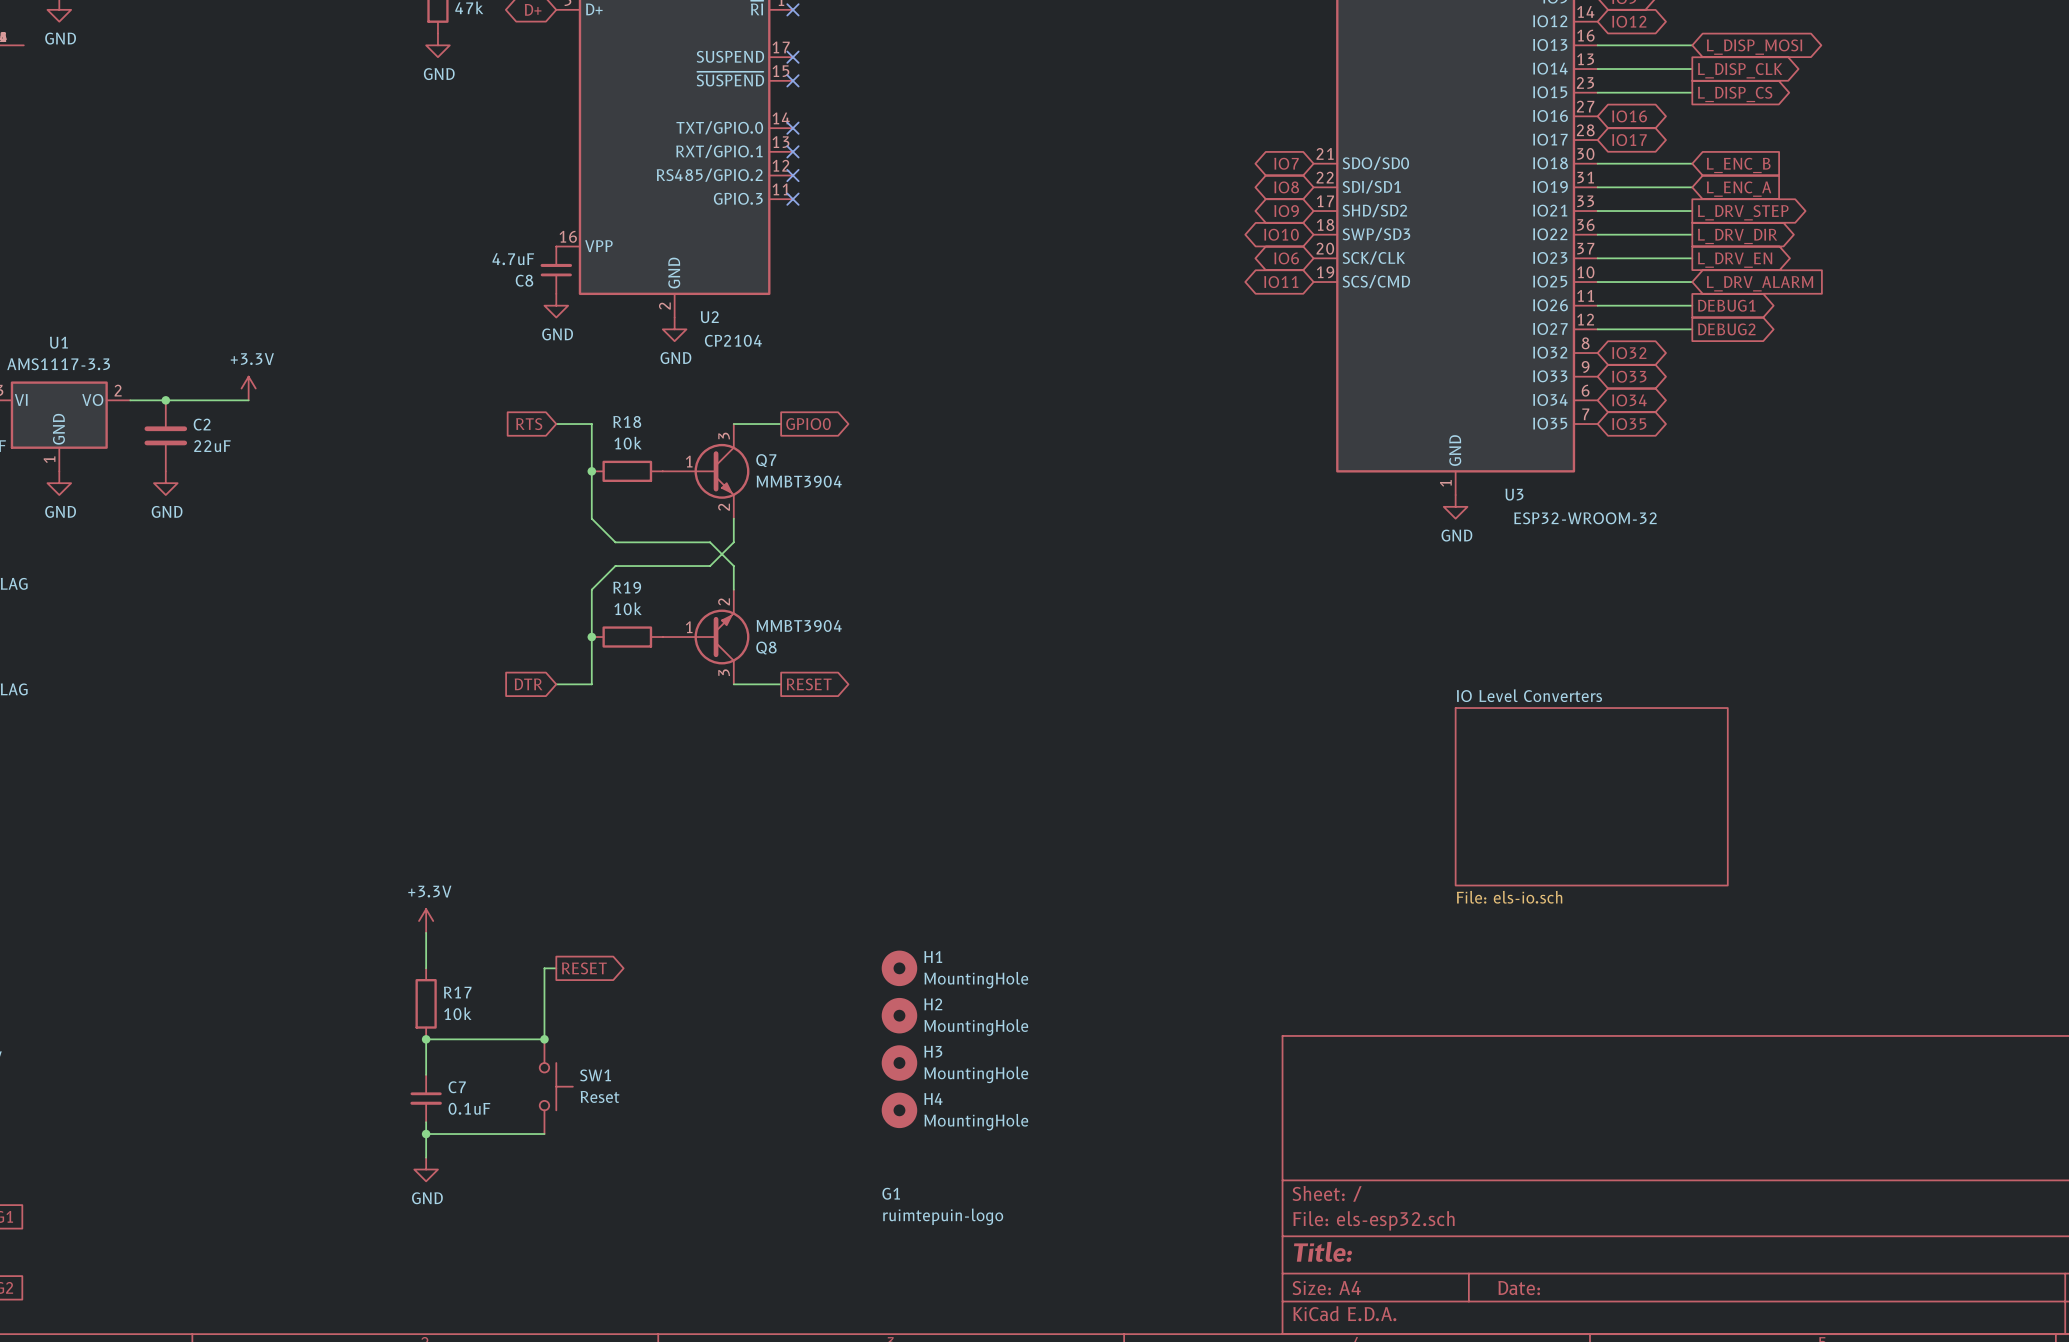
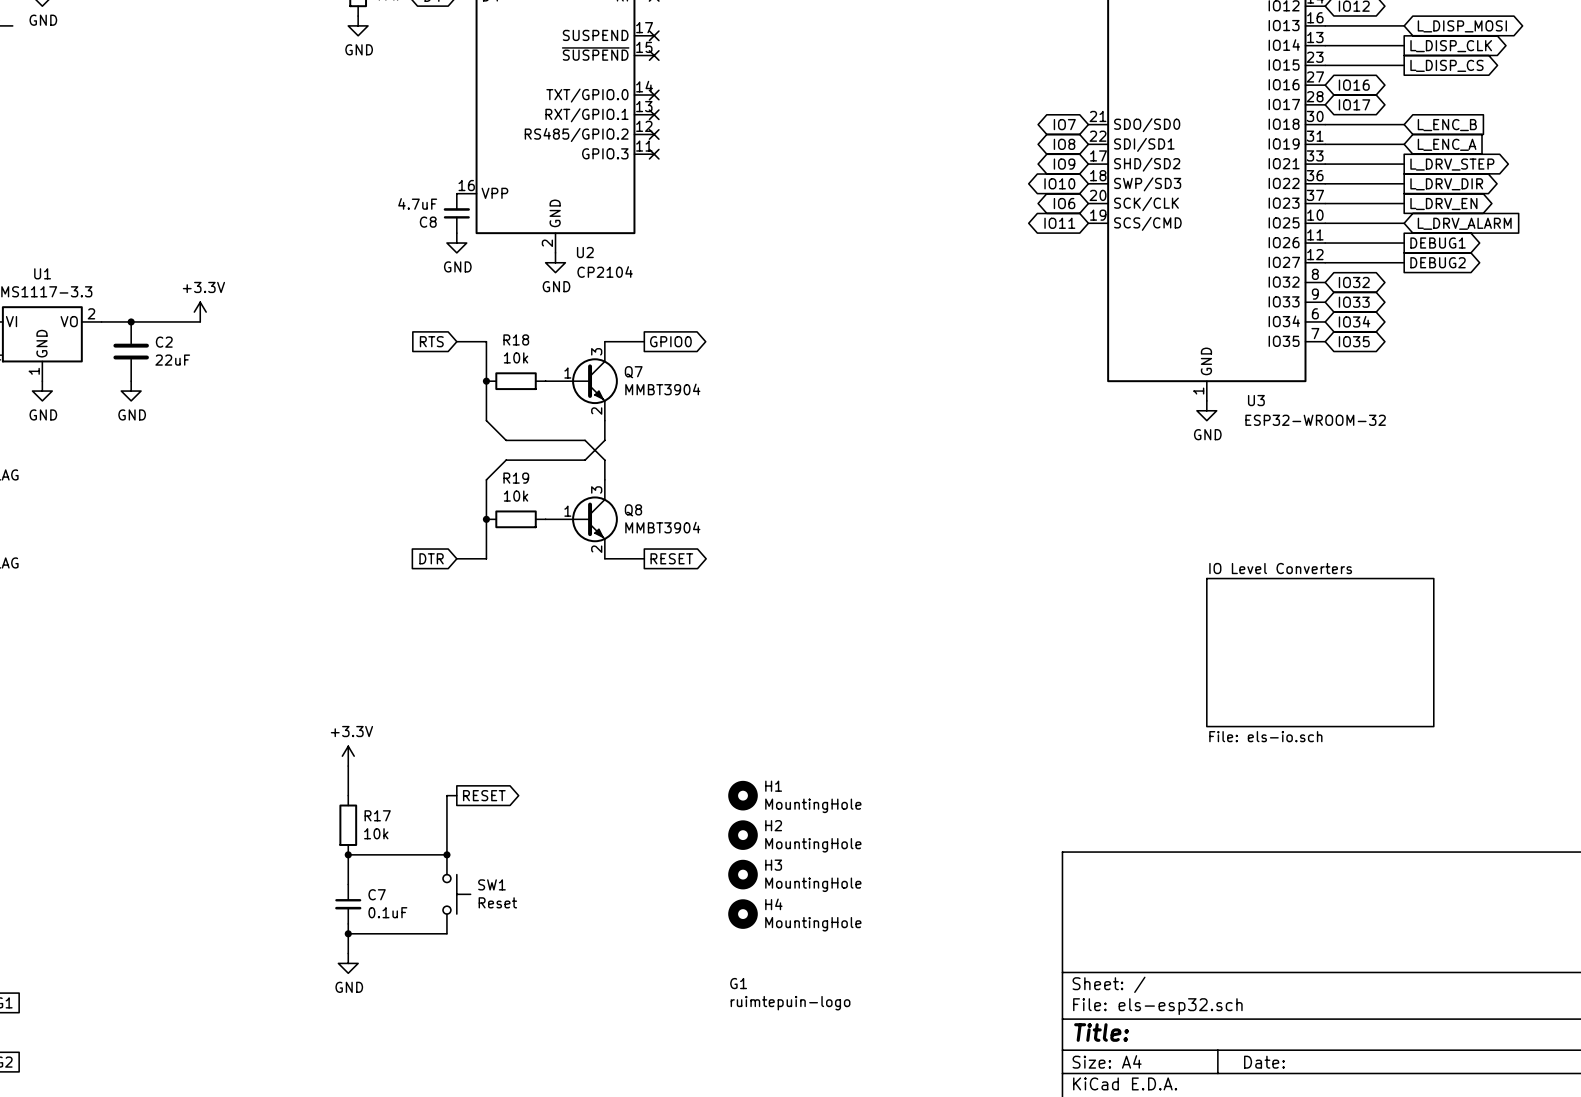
Q8 flip: as is (721, 637) -> up-down (594, 519)

